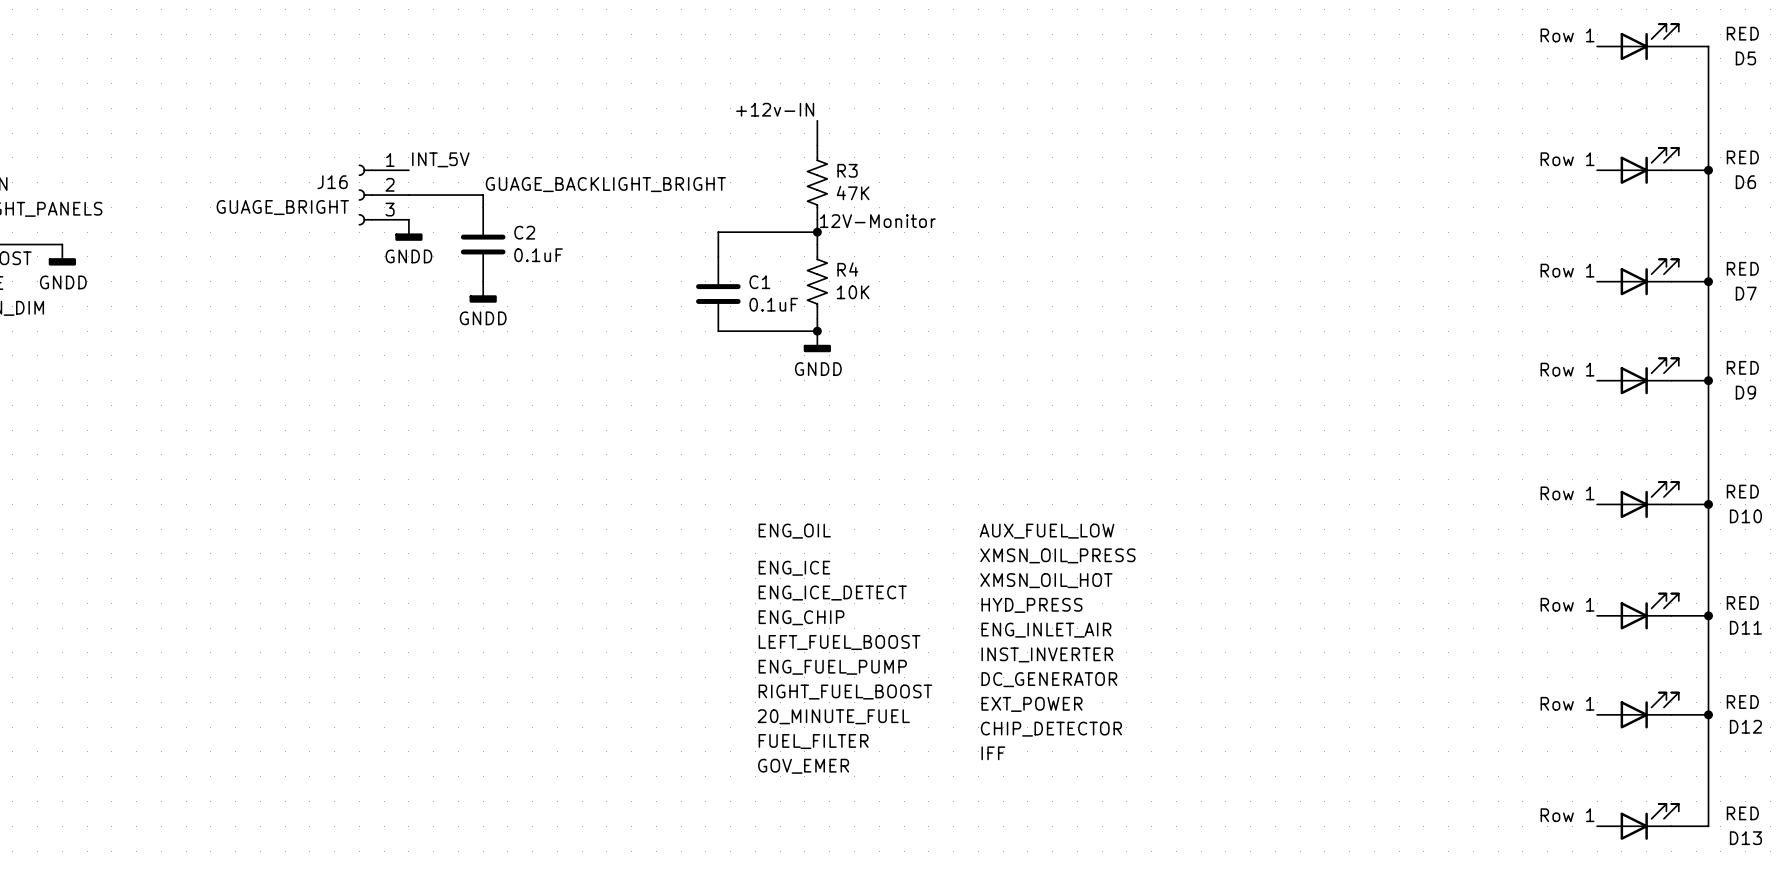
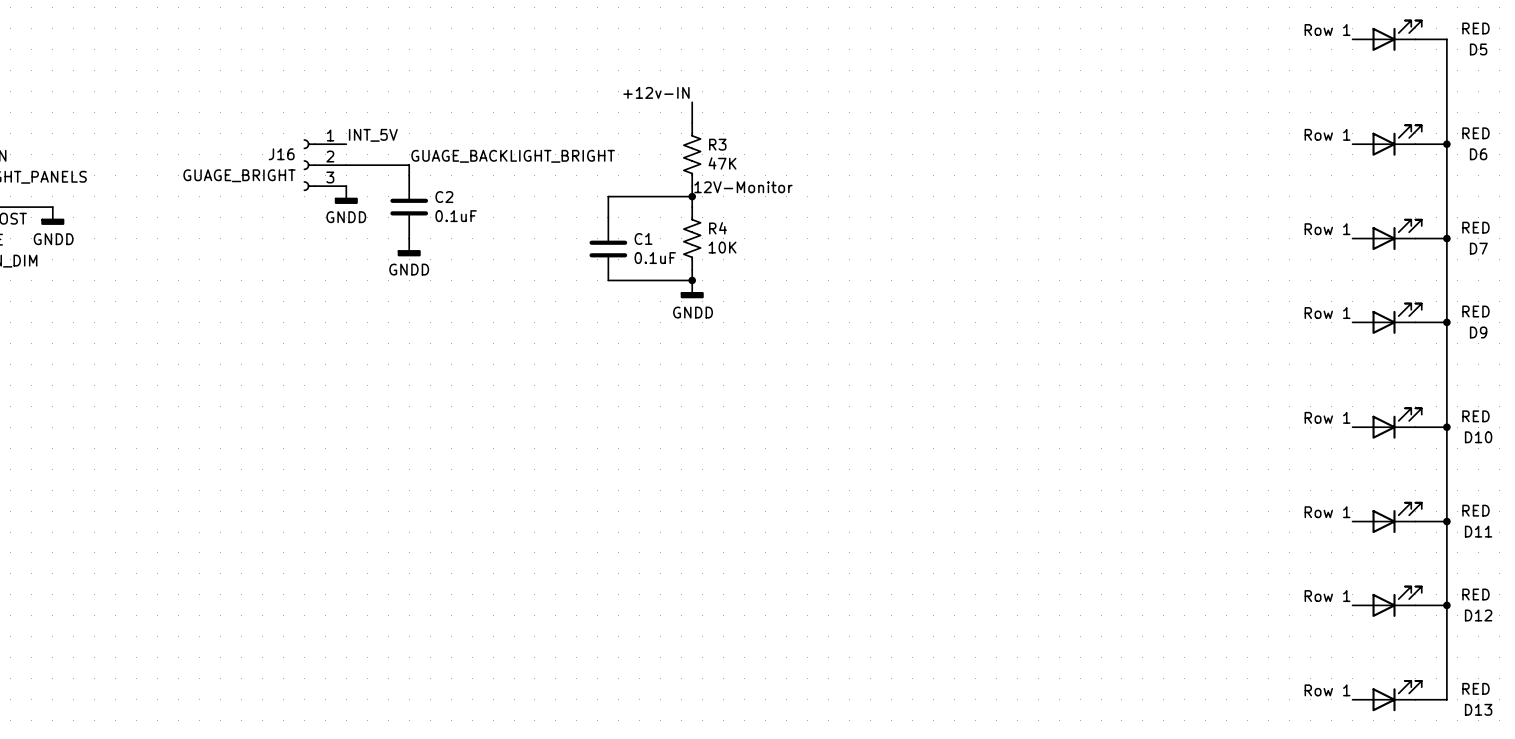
label: ENG_OIL (794, 531) -> none
label: AUX_FUEL_LOW (1047, 531) -> none
label: XMSN_OIL_PRESS (1057, 555) -> none
label: ENG_ICE (794, 568) -> none
label: XMSN_OIL_HOT (1046, 580) -> none
label: ENG_ICE_DETECT (832, 593) -> none
label: HYD_PRESS (1031, 605) -> none
label: ENG_CHIP (801, 617) -> none
label: ENG_INLET_AIR (1046, 630) -> none
label: LEFT_FUEL_BOOST (839, 642) -> none
label: INST_INVERTER (1047, 654) -> none
label: ENG_FUEL_PUMP (832, 667) -> none
label: DC_GENERATOR (1049, 679) -> none
label: RIGHT_FUEL_BOOST (845, 692) -> none
label: EXT_POWER (1031, 704) -> none
label: 20_MINUTE_FUEL (833, 716) -> none
label: CHIP_DETECTOR (1051, 729) -> none
label: FUEL_FILTER (813, 741) -> none
label: IFF (993, 753) -> none
label: GOV_EMER (803, 766) -> none

